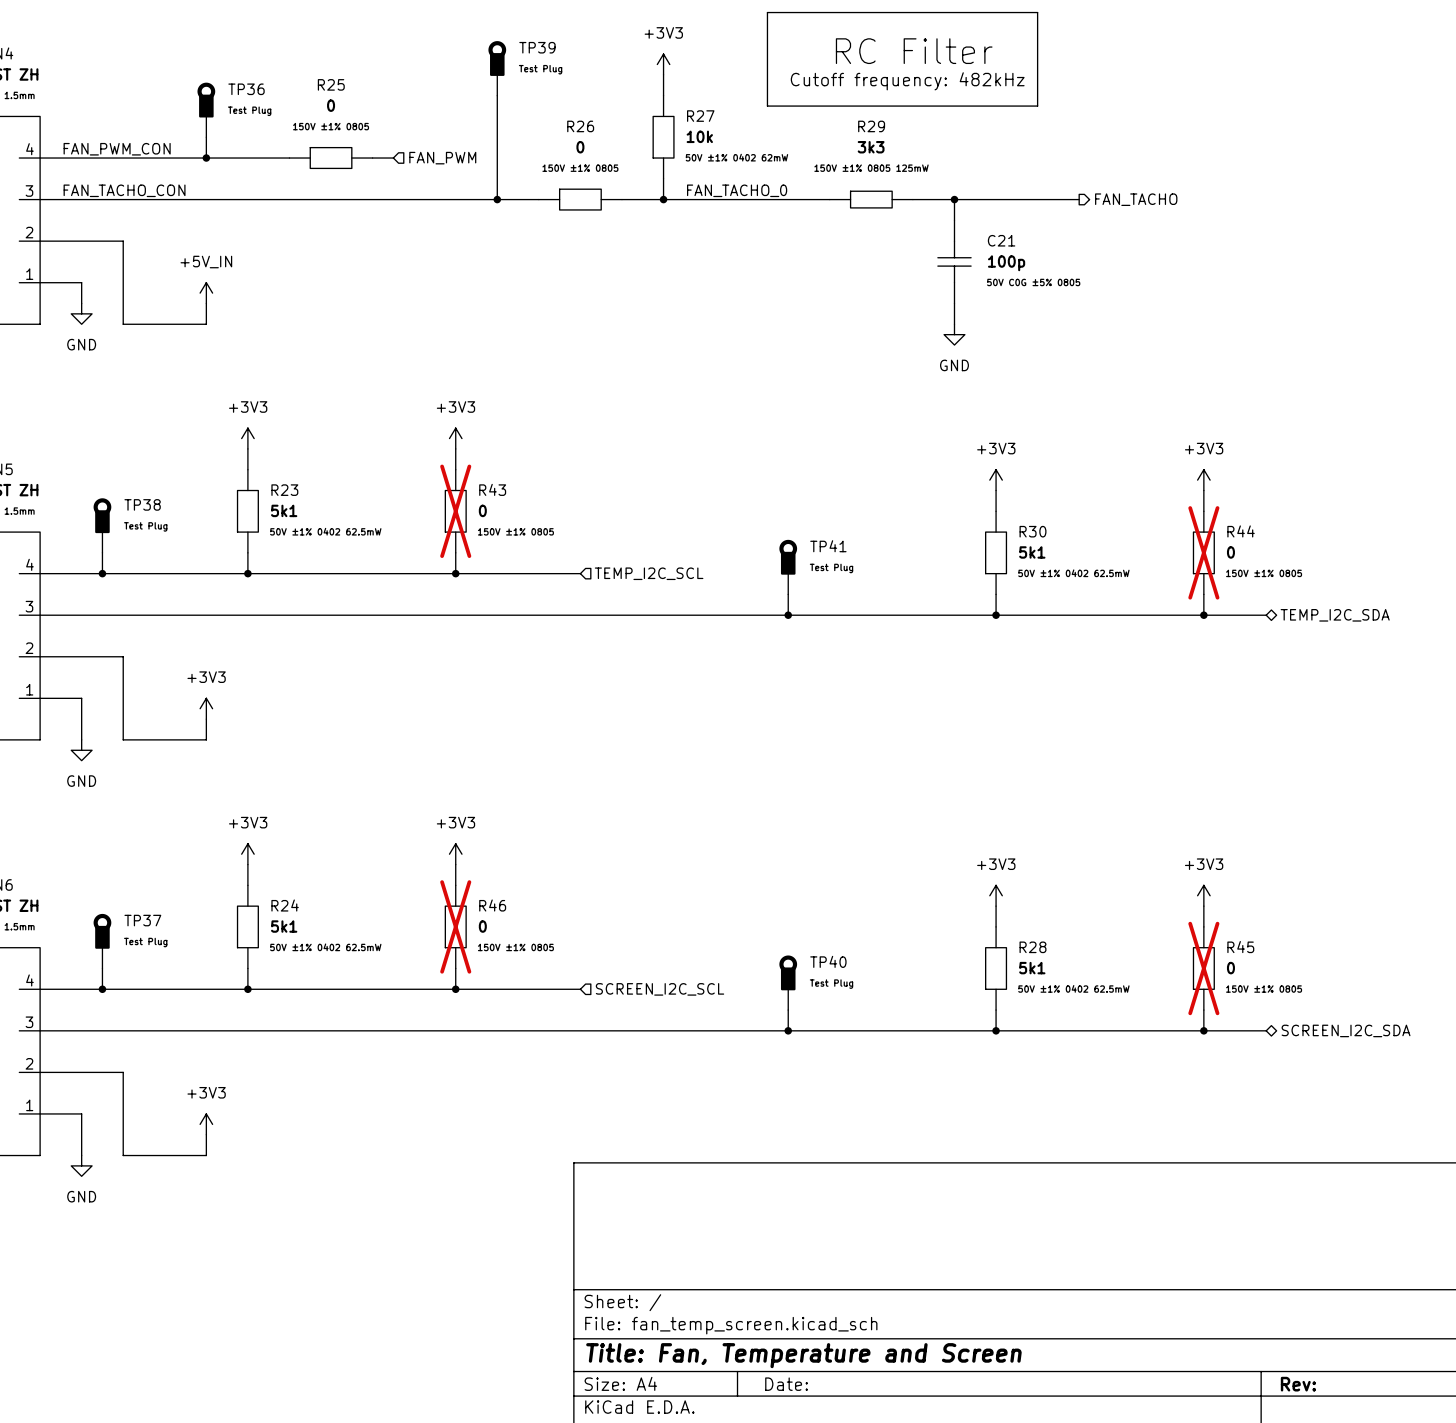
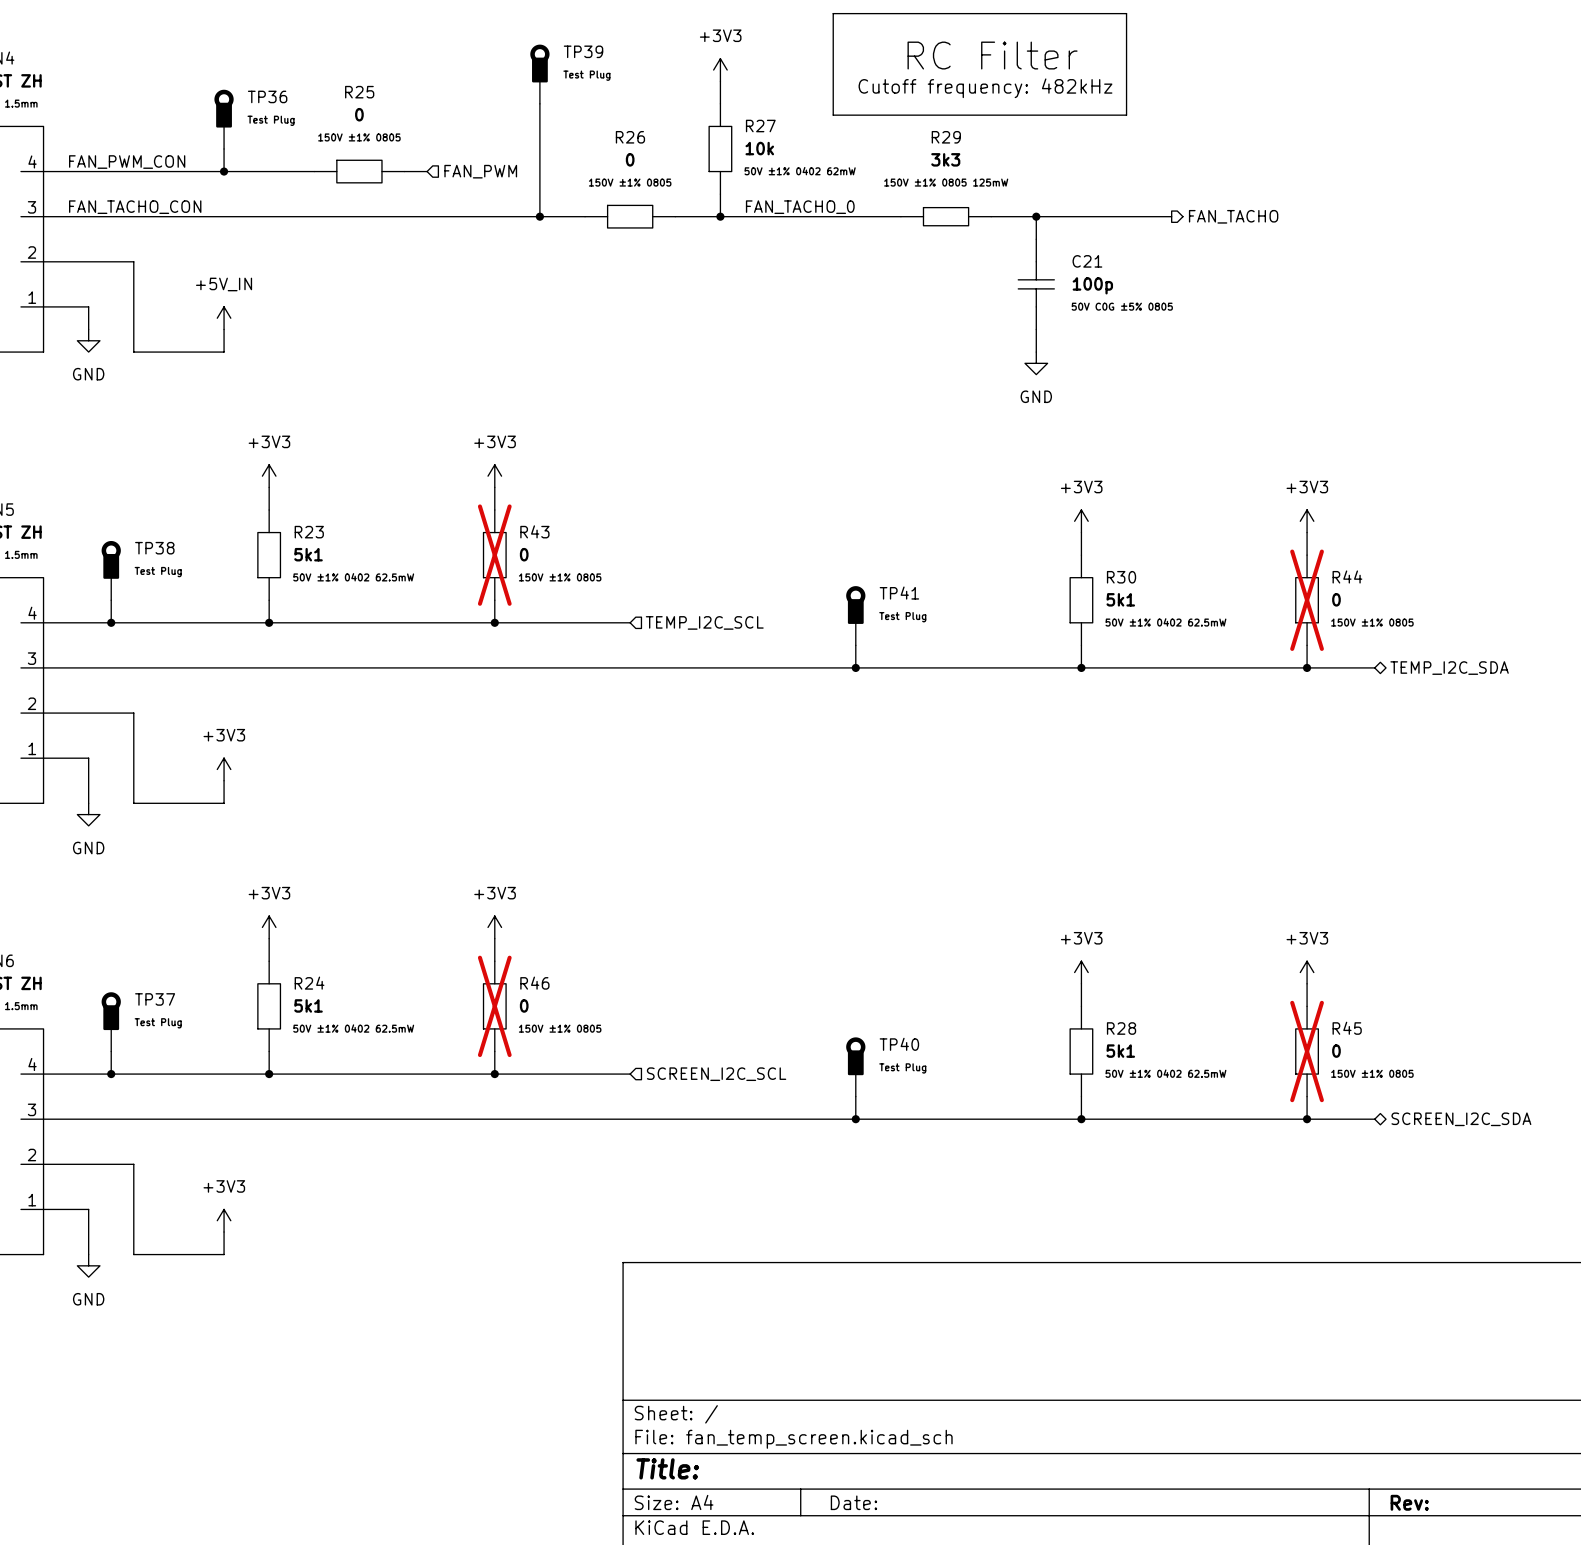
title block: Title: Fan, Temperature and Screen (803, 1355) -> Title: (667, 1468)

